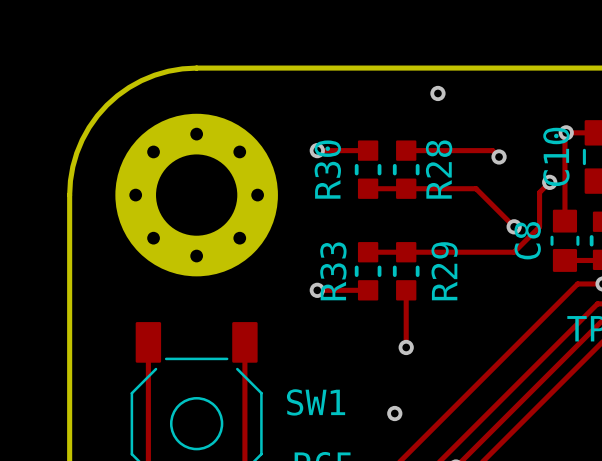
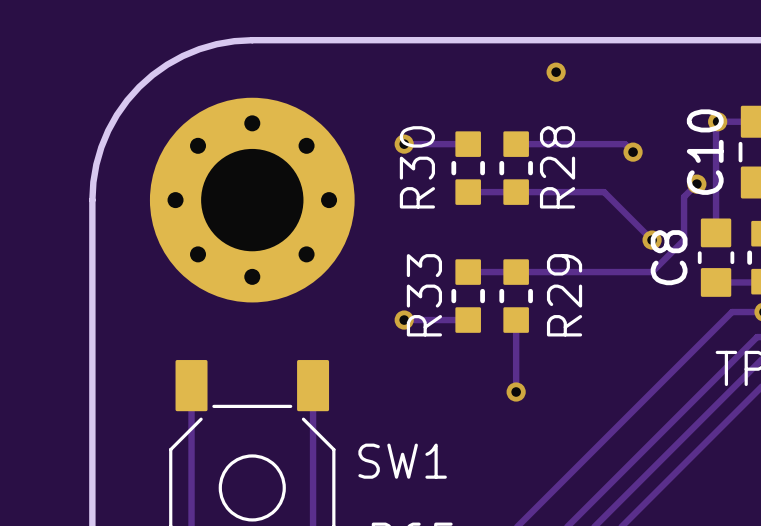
via: (394, 413) -> none

